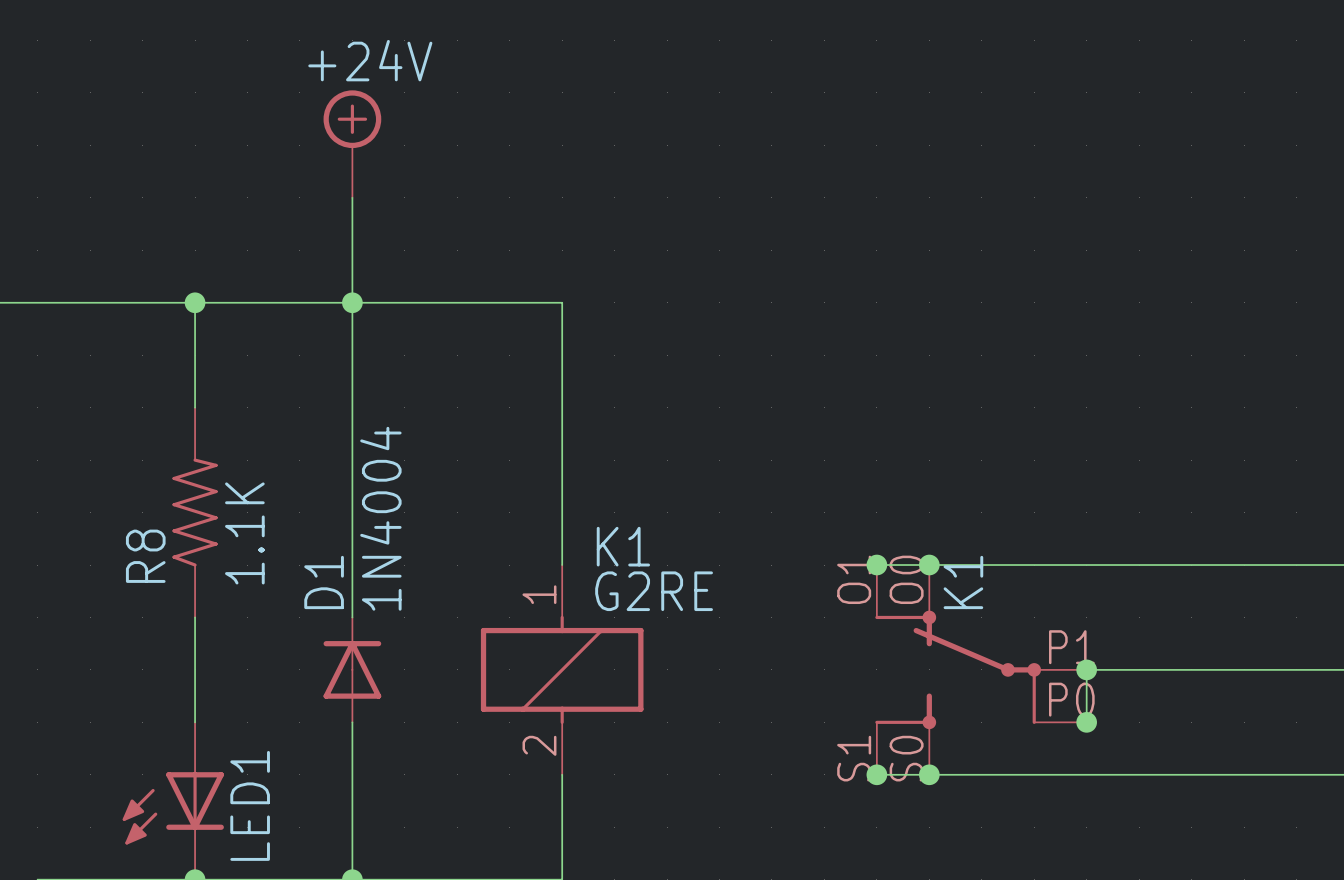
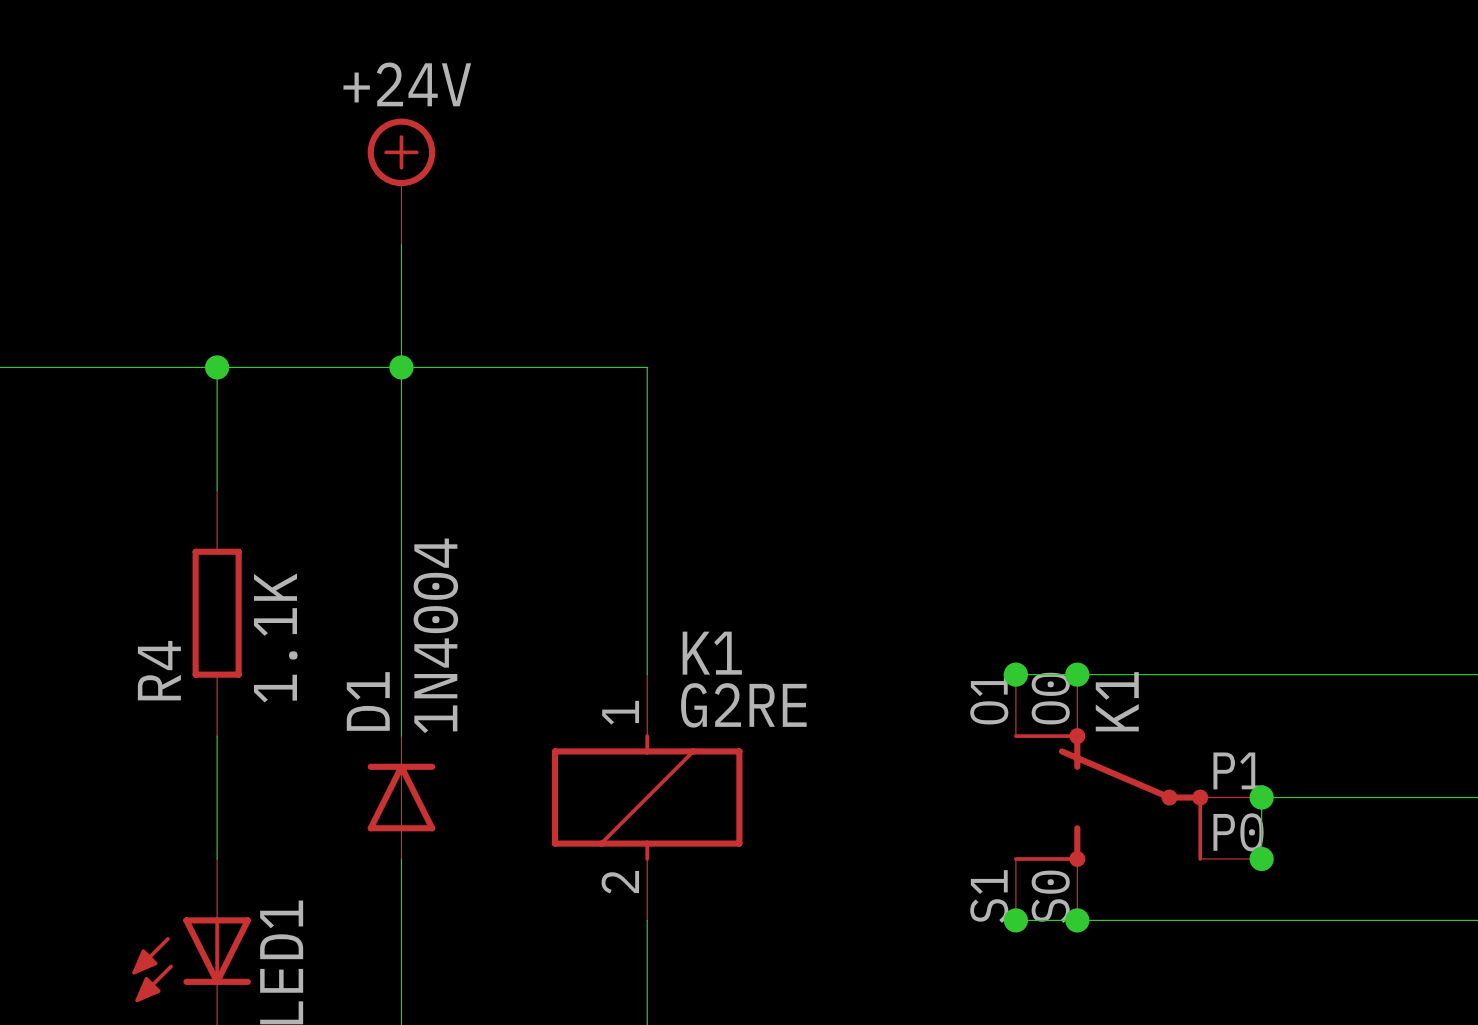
R8: 1.1K (195, 512) -> none
R4: none -> 1.1K (217, 613)

